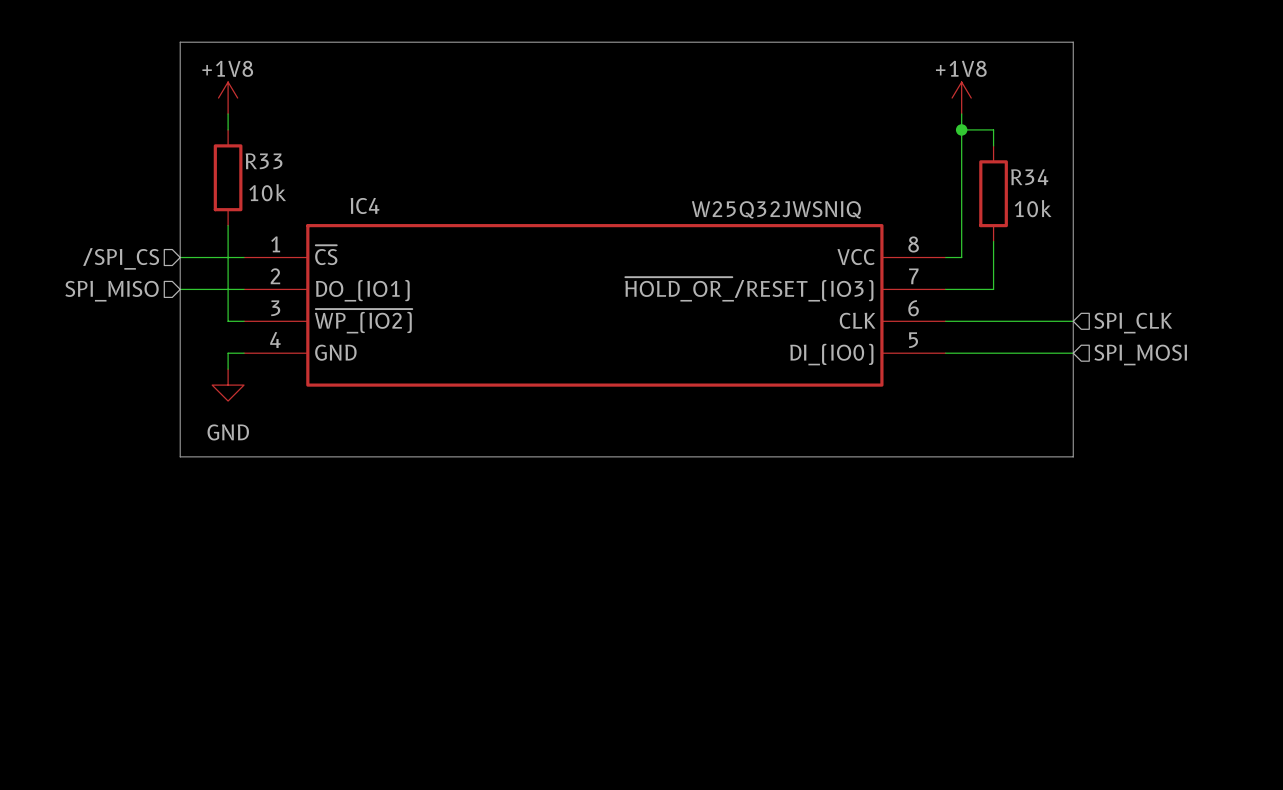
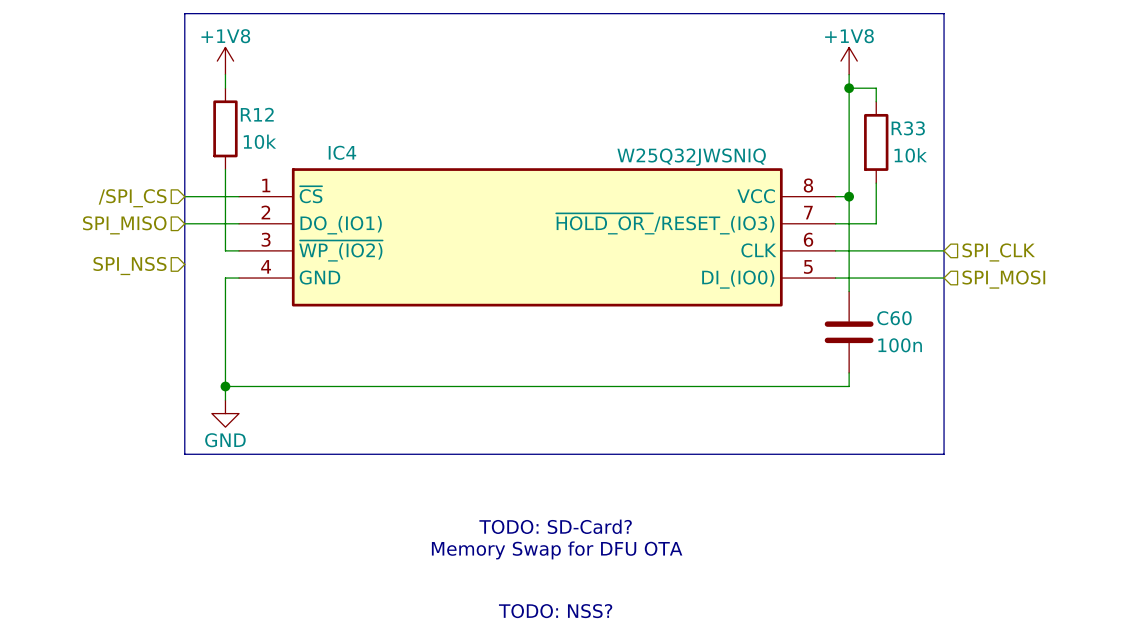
R33 name: R33 (264, 161) -> R12 (257, 114)
R34 name: R34 (1029, 177) -> R33 (908, 128)
wire: none -> (849, 196) (849, 291)
junction: none -> (849, 196)
hierarchical label: none -> SPI_NSS (130, 266)
wire: none -> (225, 291) (225, 400)
power symbol position: GND (228, 385) -> GND (225, 413)
C60: none -> 100n (849, 332)
power symbol text position: GND (228, 432) -> GND (225, 440)
line: (180, 456) (1073, 456) -> (184, 366) (184, 454) (944, 454) (944, 366)
wire: none -> (849, 372) (849, 386) (225, 386)
junction: none -> (225, 386)
text: none -> TODO: SD-Card? (555, 526)
text: none -> Memory Swap for DFU OTA (557, 550)
text: none -> TODO: NSS? (555, 611)

